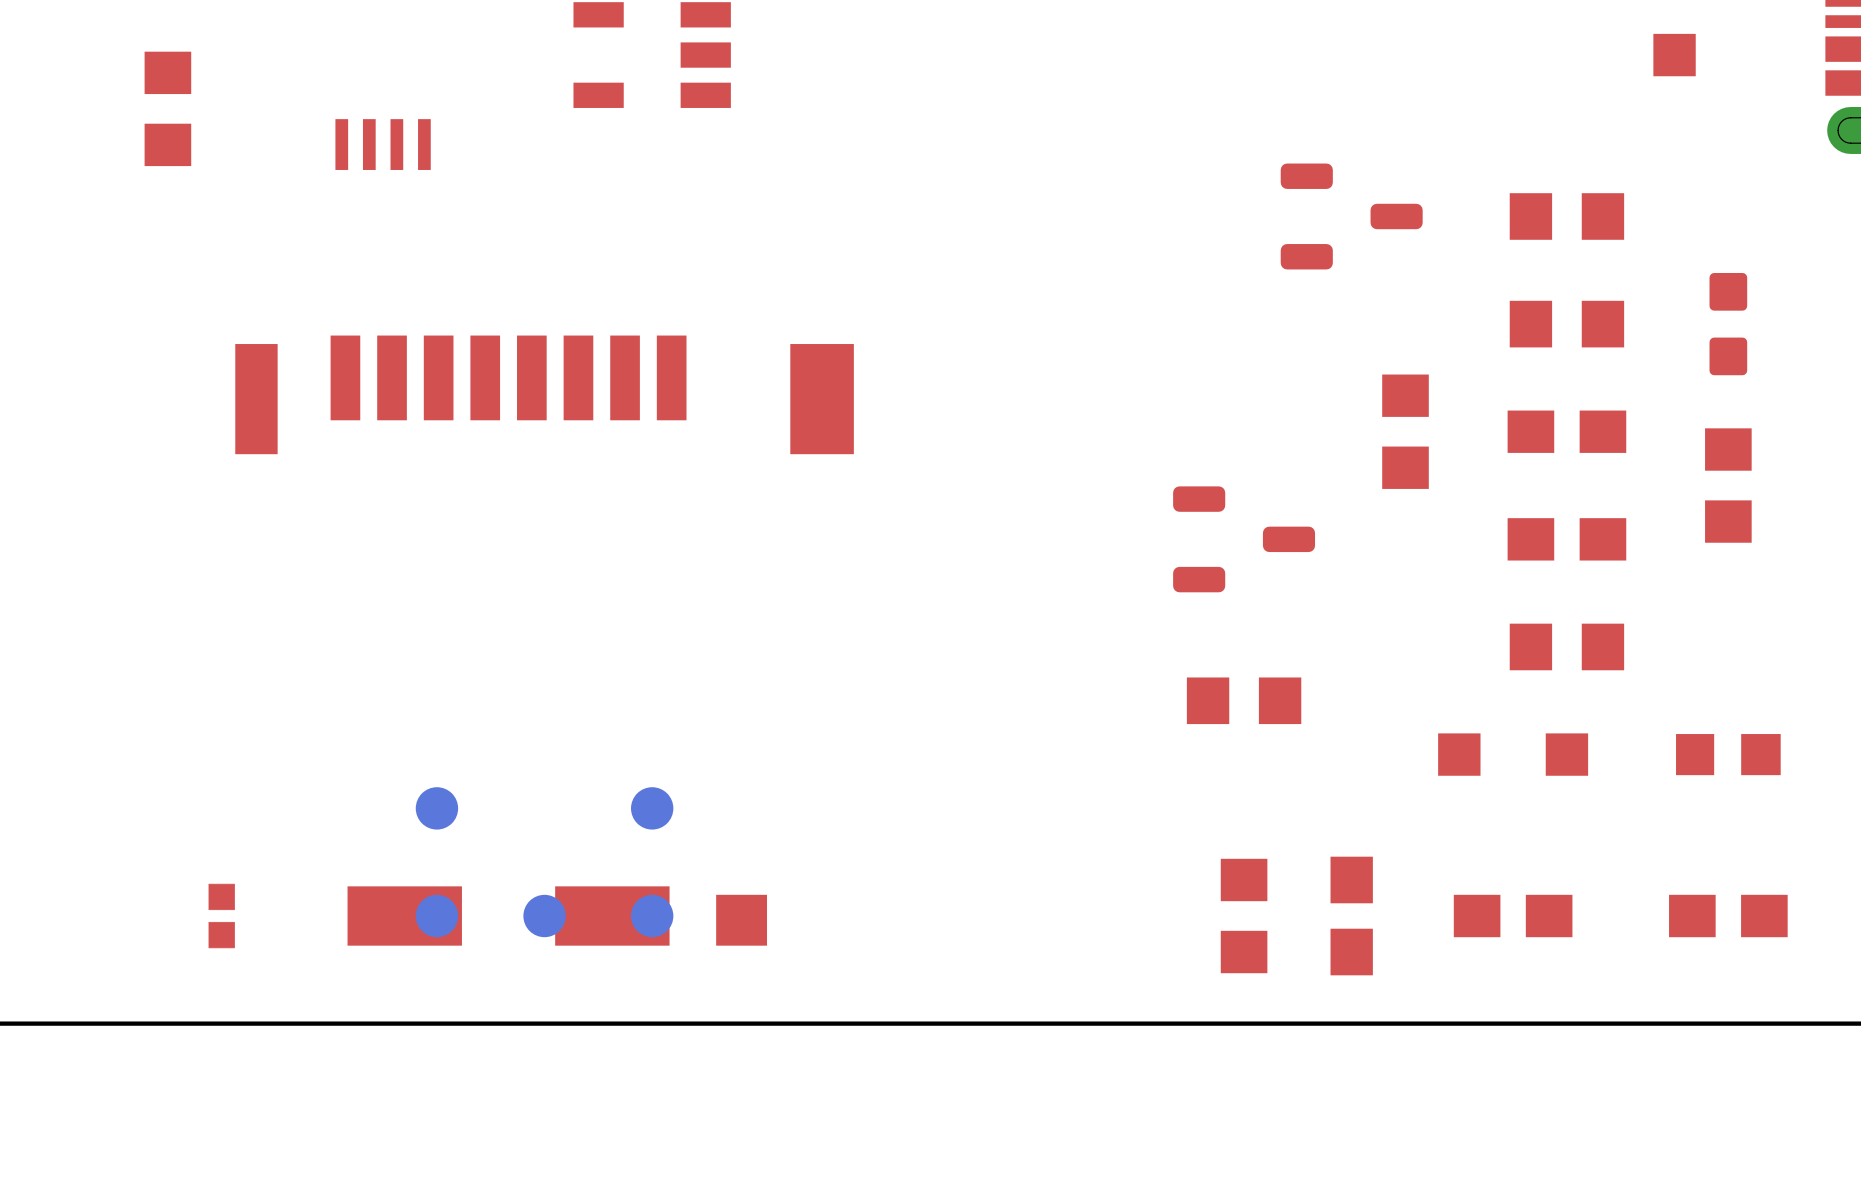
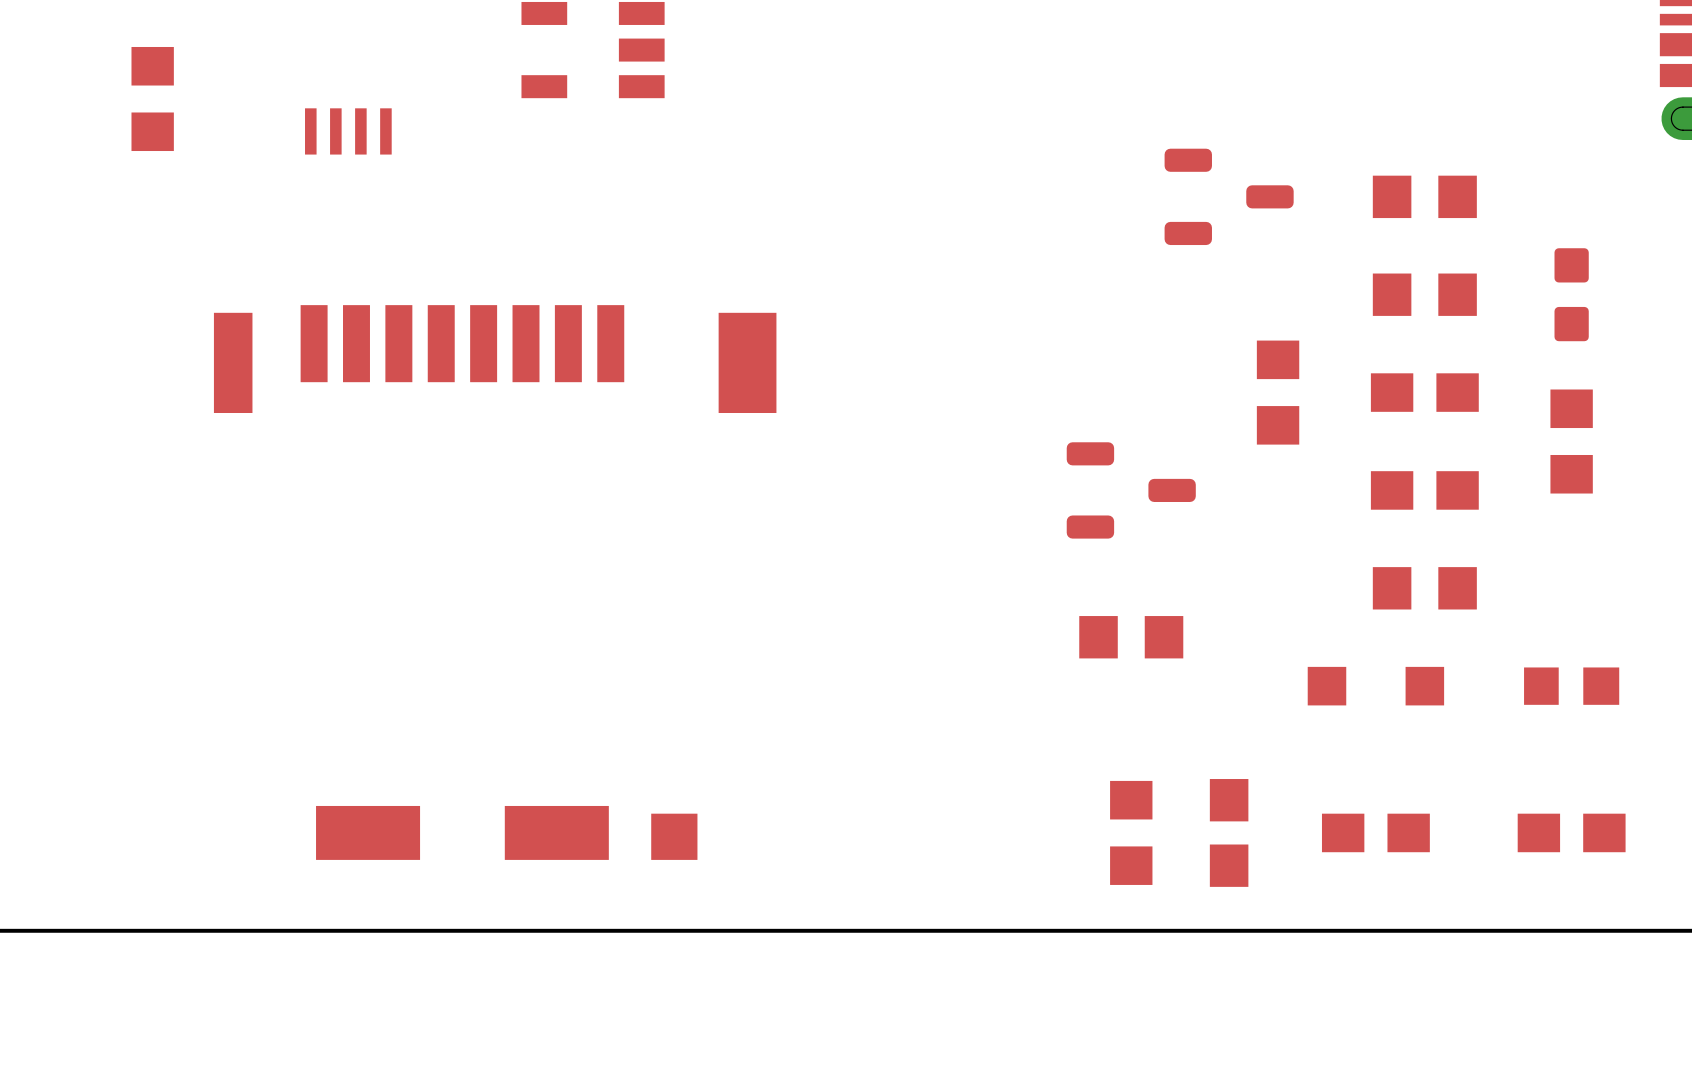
part: (1674, 55) -> none
part: (544, 862) -> none
part: (221, 916) -> none

